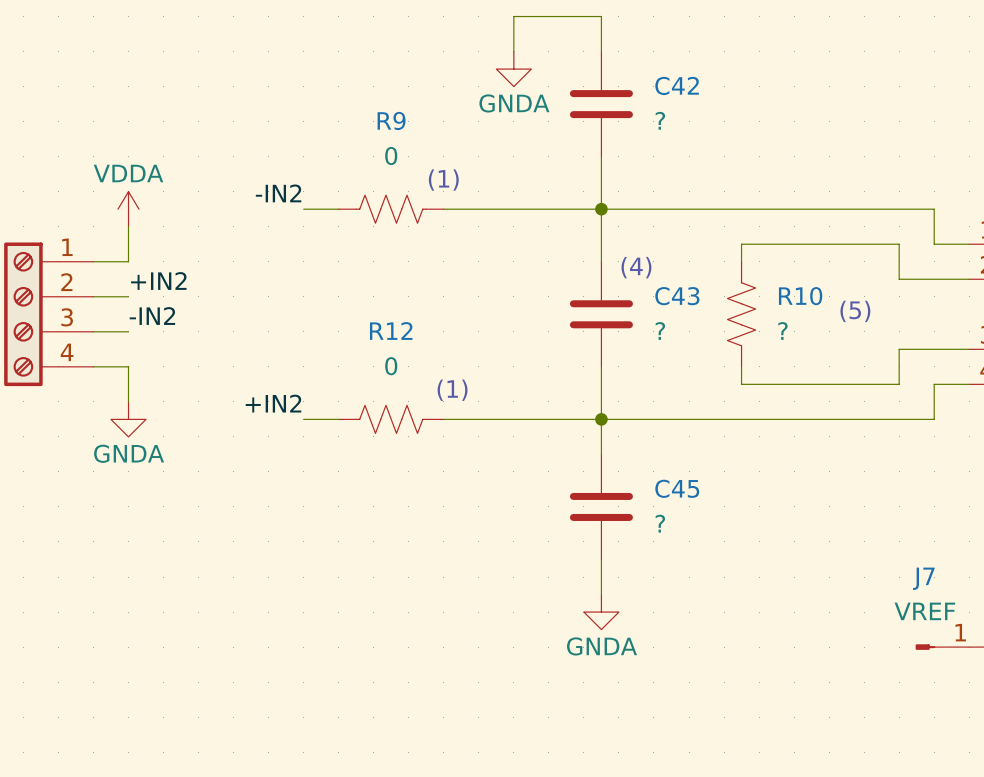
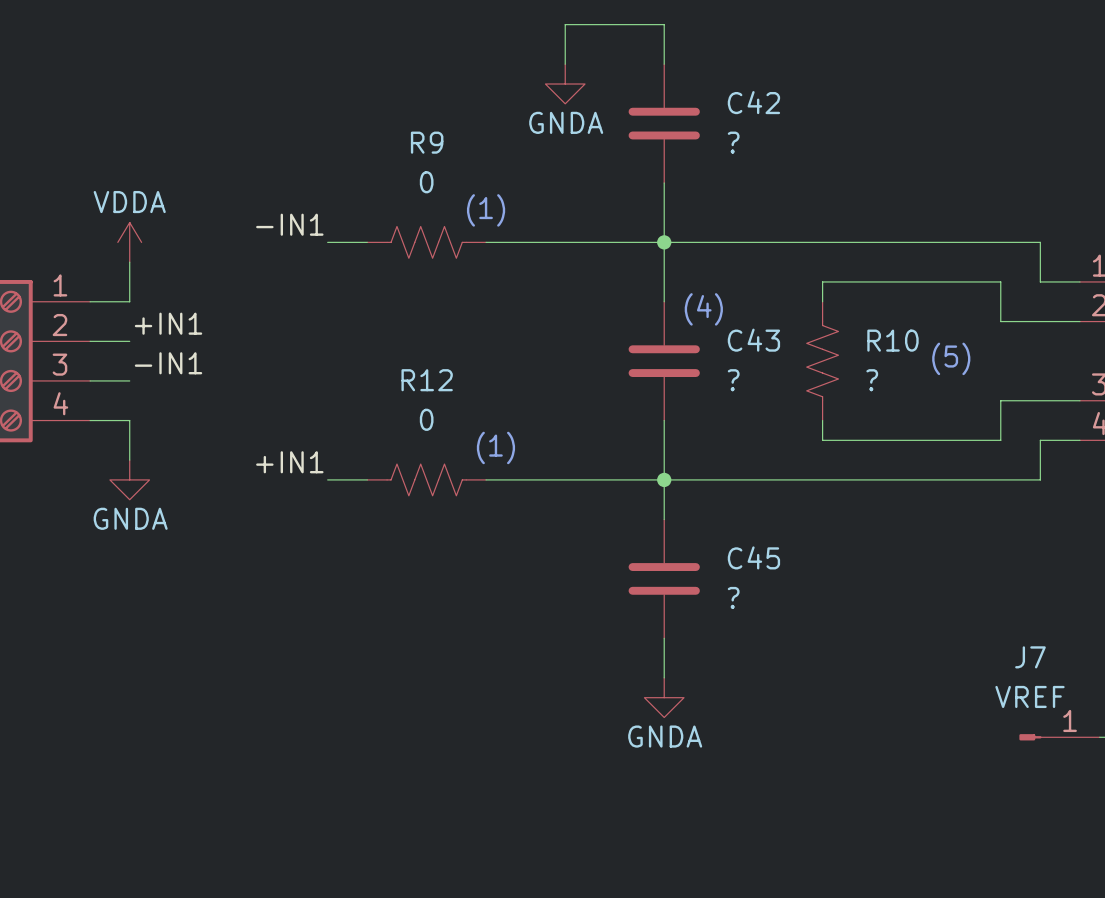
label: -IN2 (278, 193) -> -IN1 (289, 224)
label: +IN2 (158, 280) -> +IN1 (168, 323)
label: -IN2 (152, 316) -> -IN1 (168, 363)
label: +IN2 (273, 403) -> +IN1 (289, 462)

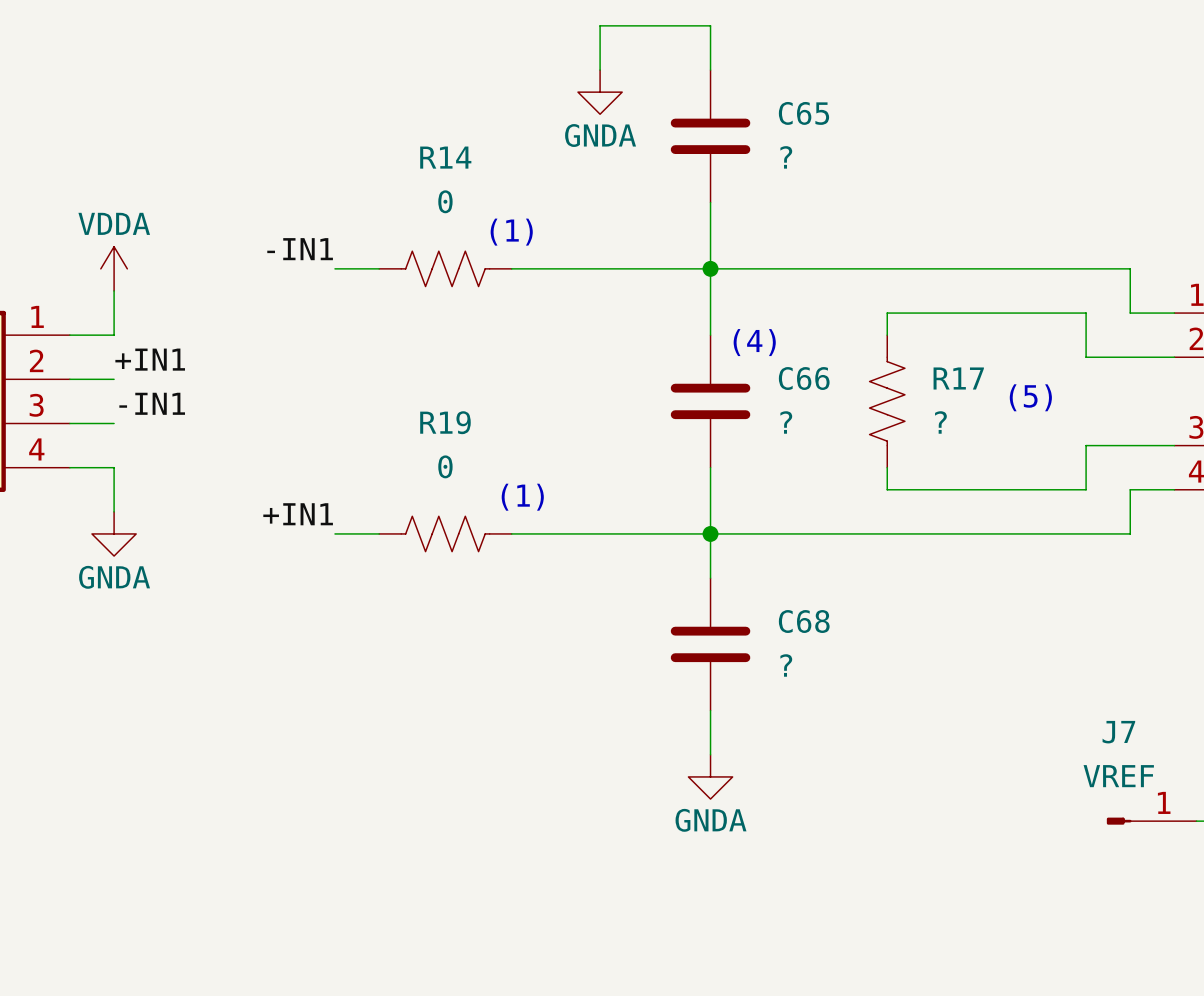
C42 name: C42 (753, 102) -> C65 (803, 113)
R9 name: R9 (427, 142) -> R14 (445, 157)
C43 name: C43 (753, 340) -> C66 (804, 378)
R10 name: R10 (892, 340) -> R17 (958, 378)
R12 name: R12 (427, 380) -> R19 (445, 422)
C45 name: C45 (753, 557) -> C68 (804, 621)

